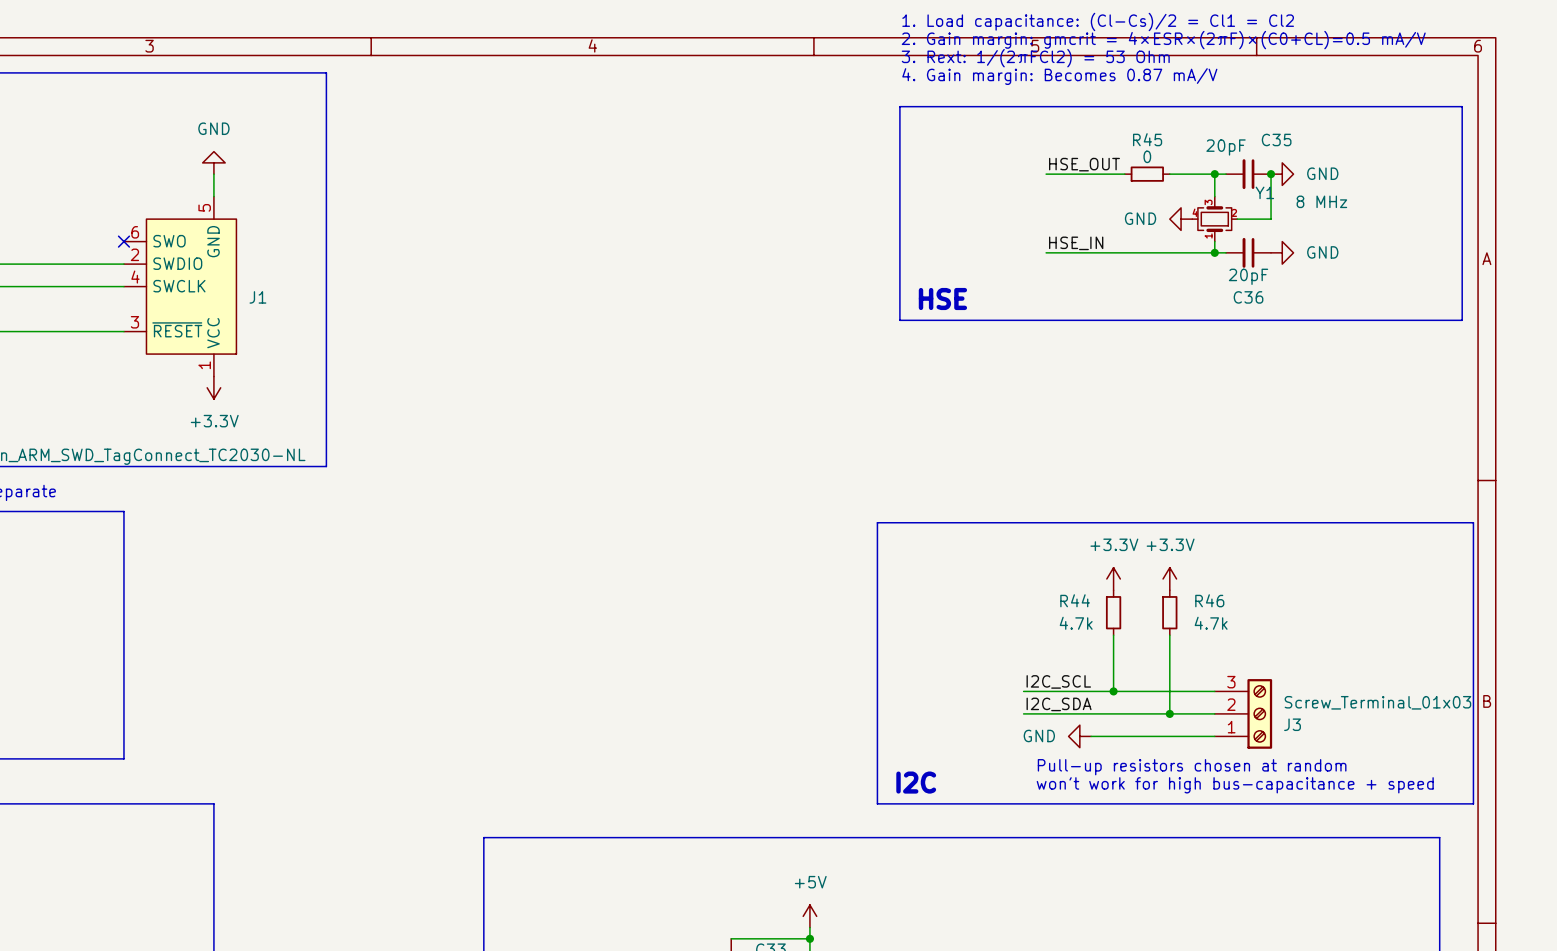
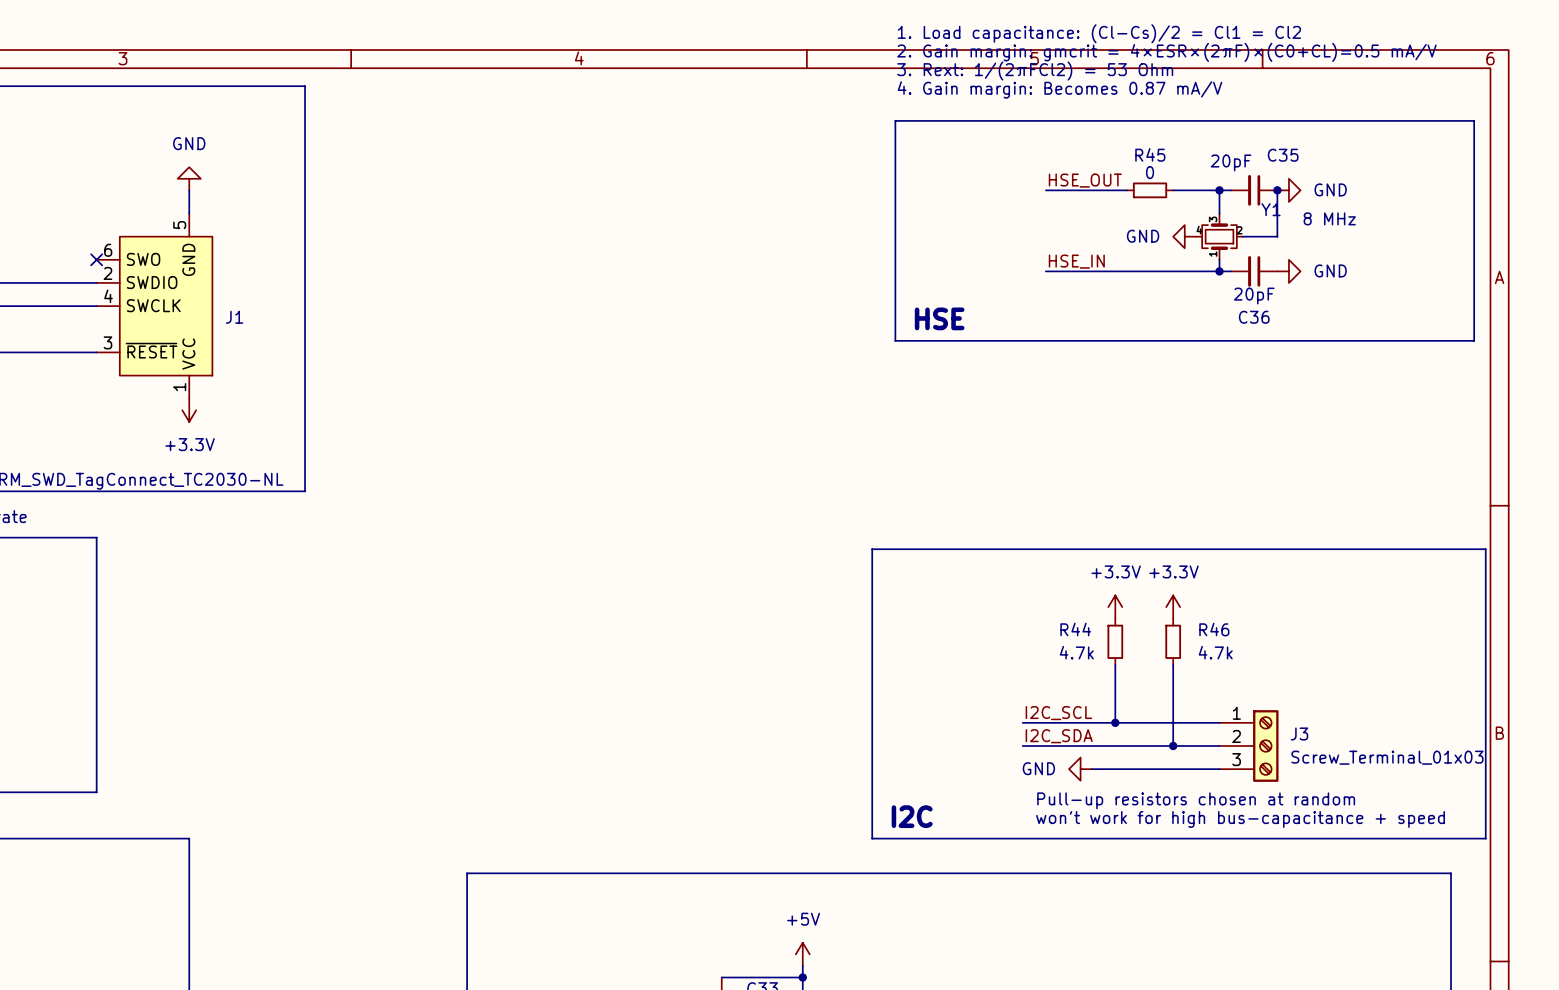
J3 flip: as is (1259, 713) -> up-down (1265, 746)

